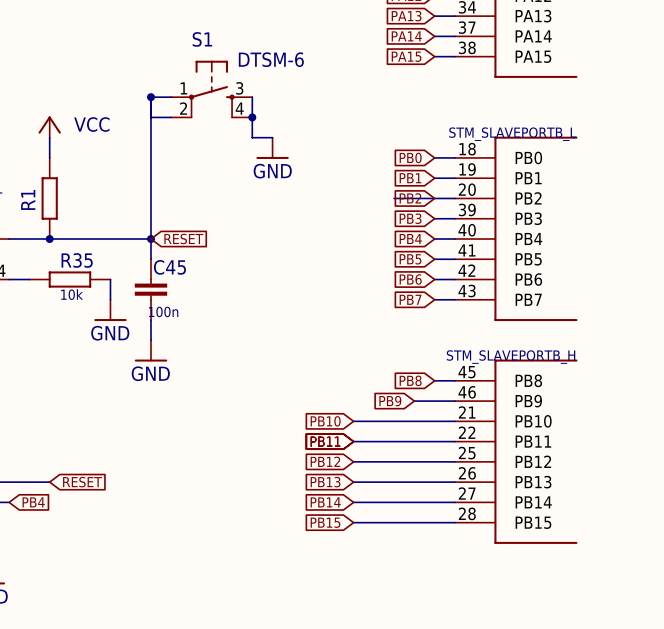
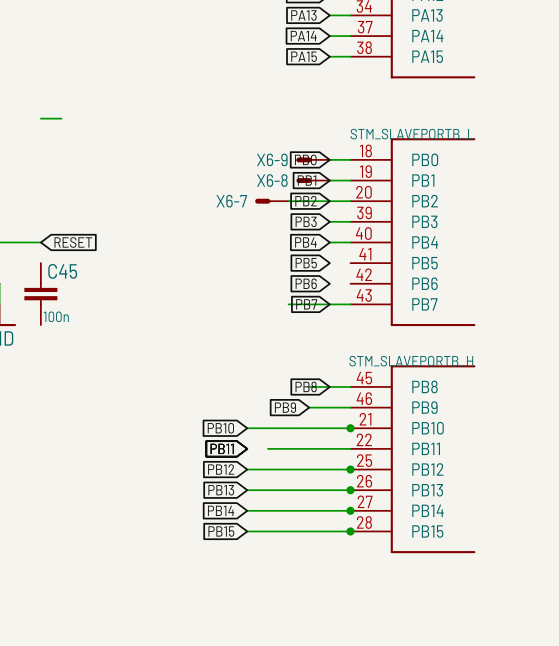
S1: DTSM-6 (211, 89) -> none
junction: (150, 97) -> none
wire: (171, 97) (150, 97) (150, 259) -> none
wire: (252, 97) (252, 137) (272, 137) -> none
junction: (252, 117) -> none
power symbol: GND (272, 148) -> none
X6-9: none -> (313, 159)
X6-8: none -> (313, 180)
X6-7: none -> (271, 201)
junction: (150, 239) -> none
wire: (434, 259) (454, 259) -> none
wire: (434, 279) (454, 279) -> (309, 386) (329, 386)
wire: none -> (288, 304) (329, 304)
wire: (150, 320) (150, 340) -> none
power symbol: GND (150, 350) -> none
junction: none -> (350, 428)
wire: (353, 441) (373, 441) -> none
junction: none -> (350, 469)
junction: none -> (350, 490)
junction: none -> (350, 510)
junction: none -> (350, 531)

